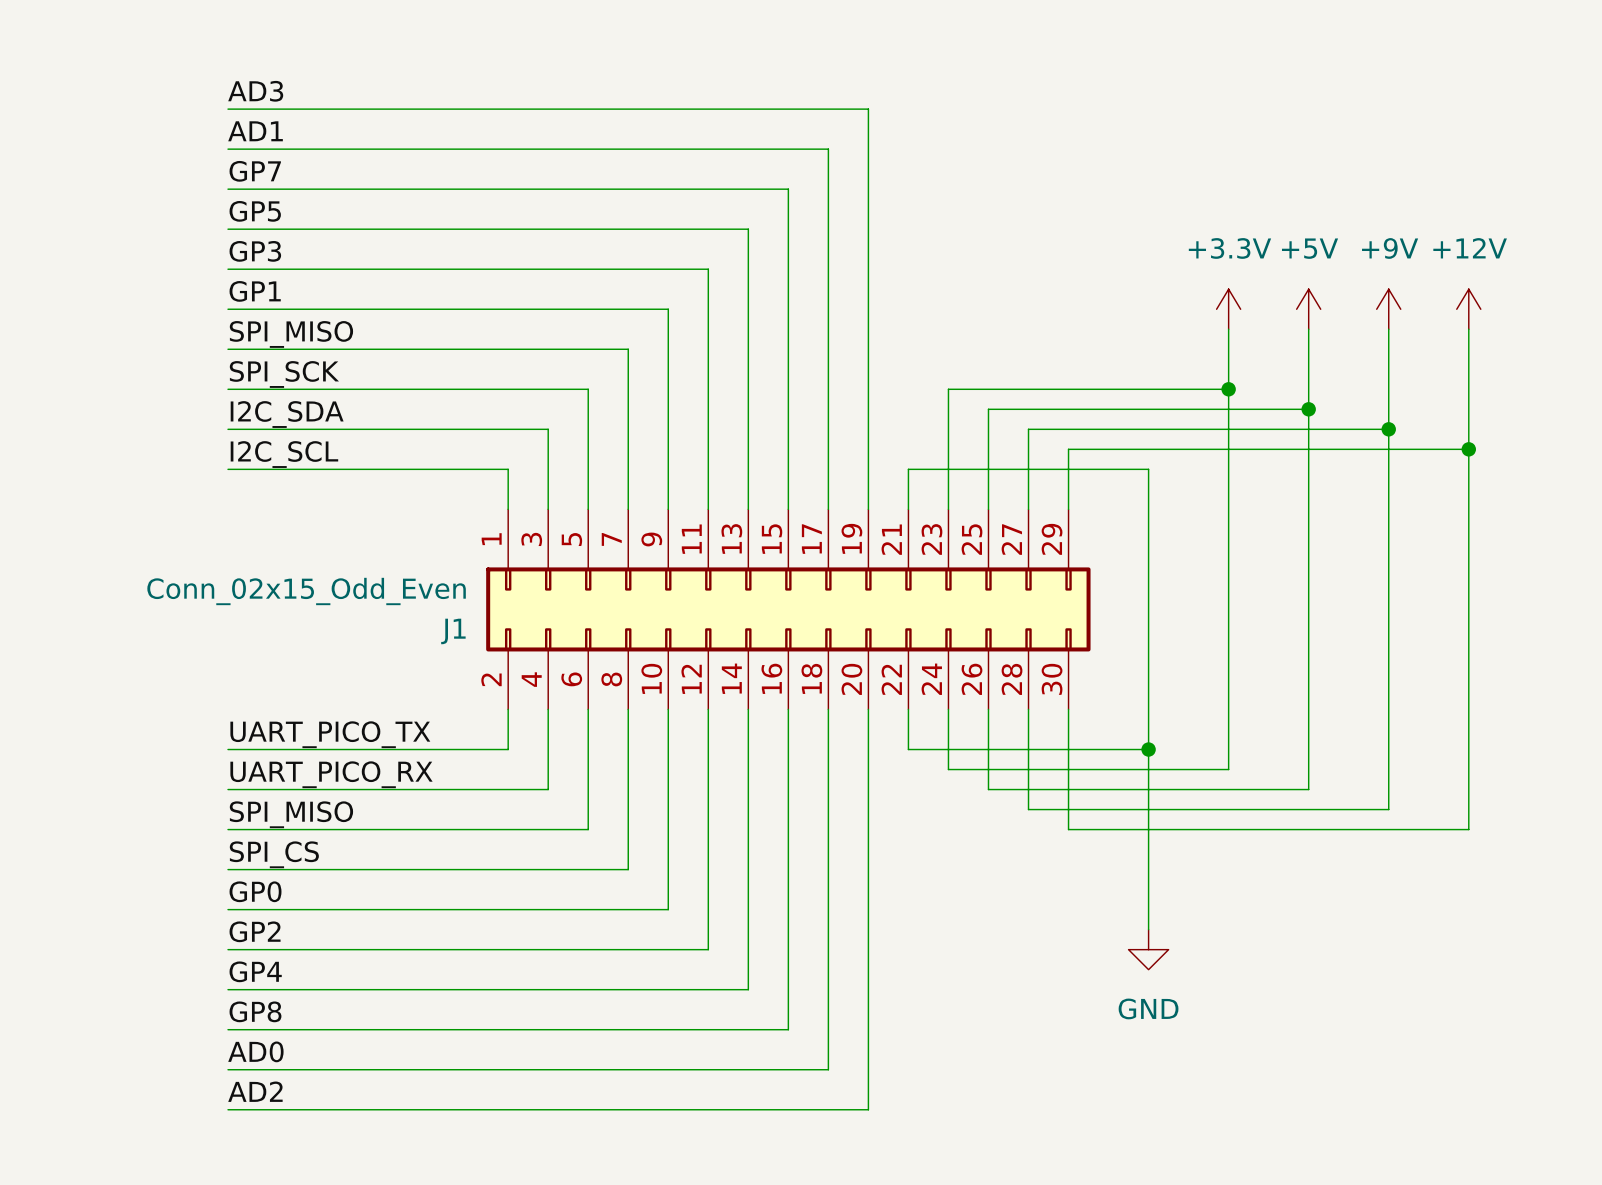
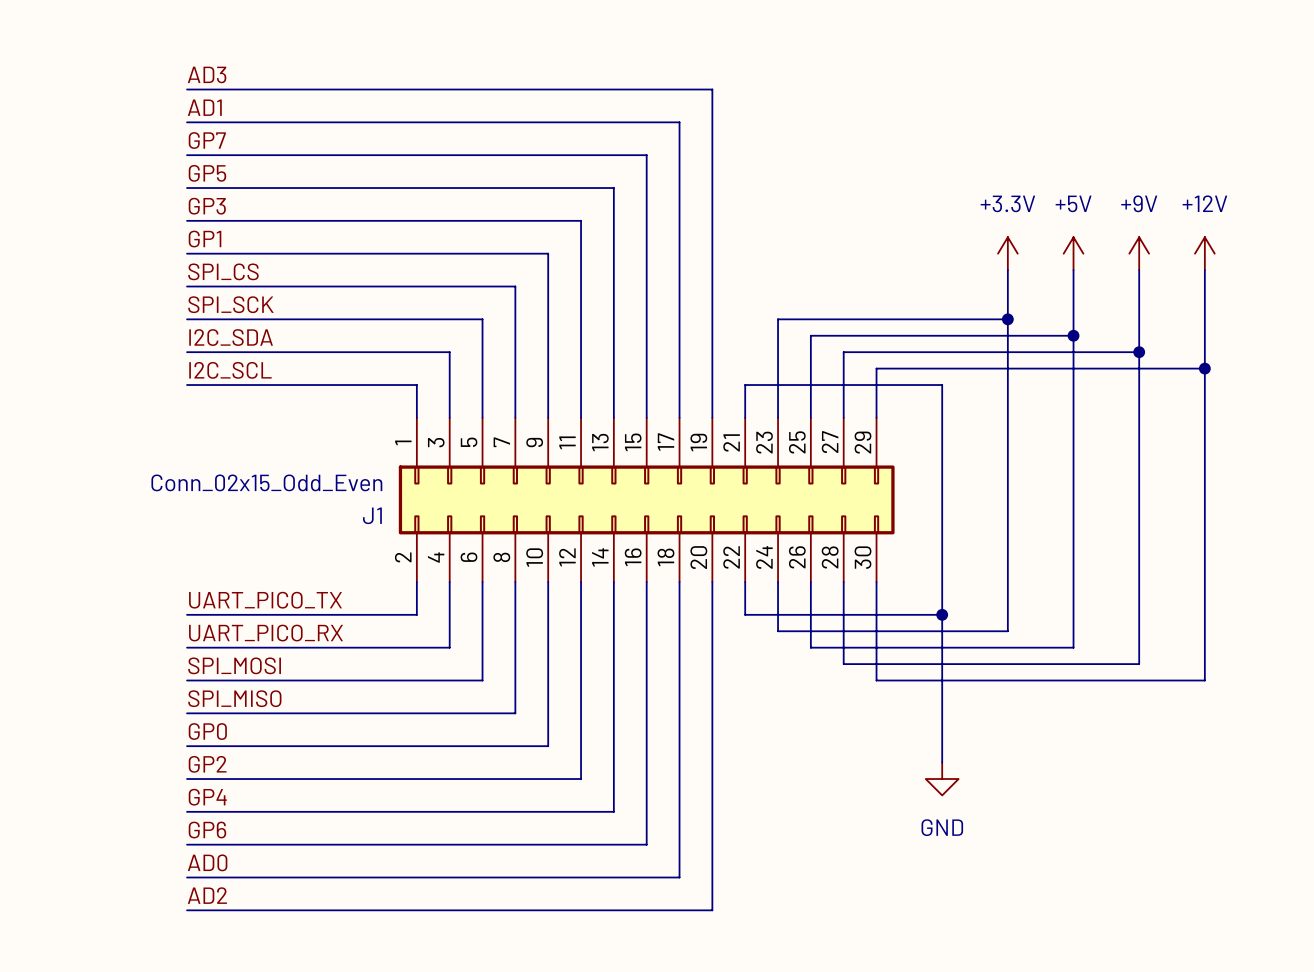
label: SPI_MISO (291, 334) -> SPI_CS (223, 271)
label: SPI_MISO (291, 814) -> SPI_MOSI (234, 665)
label: SPI_CS (274, 854) -> SPI_MISO (234, 698)
label: GP8 (255, 1011) -> GP6 (207, 830)

